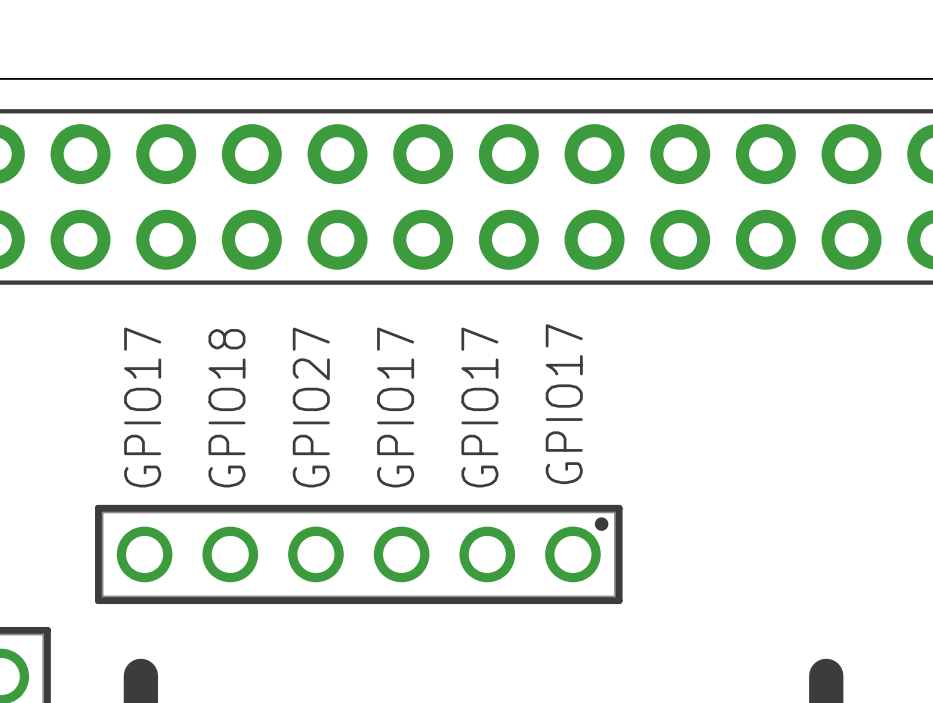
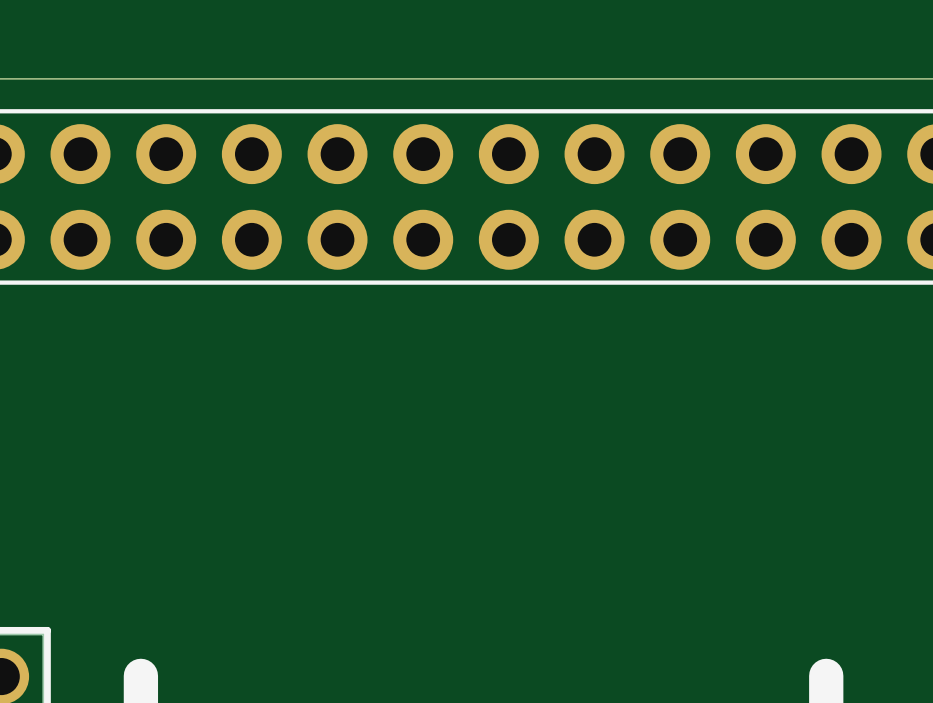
text: GPIO17 (564, 404) -> none
text: GPIO17 (142, 407) -> none
text: GPIO27 (311, 407) -> none
text: GPIO17 (395, 407) -> none
text: GPIO17 (479, 407) -> none
text: GPIO18 (226, 408) -> none
part: (358, 554) -> none

